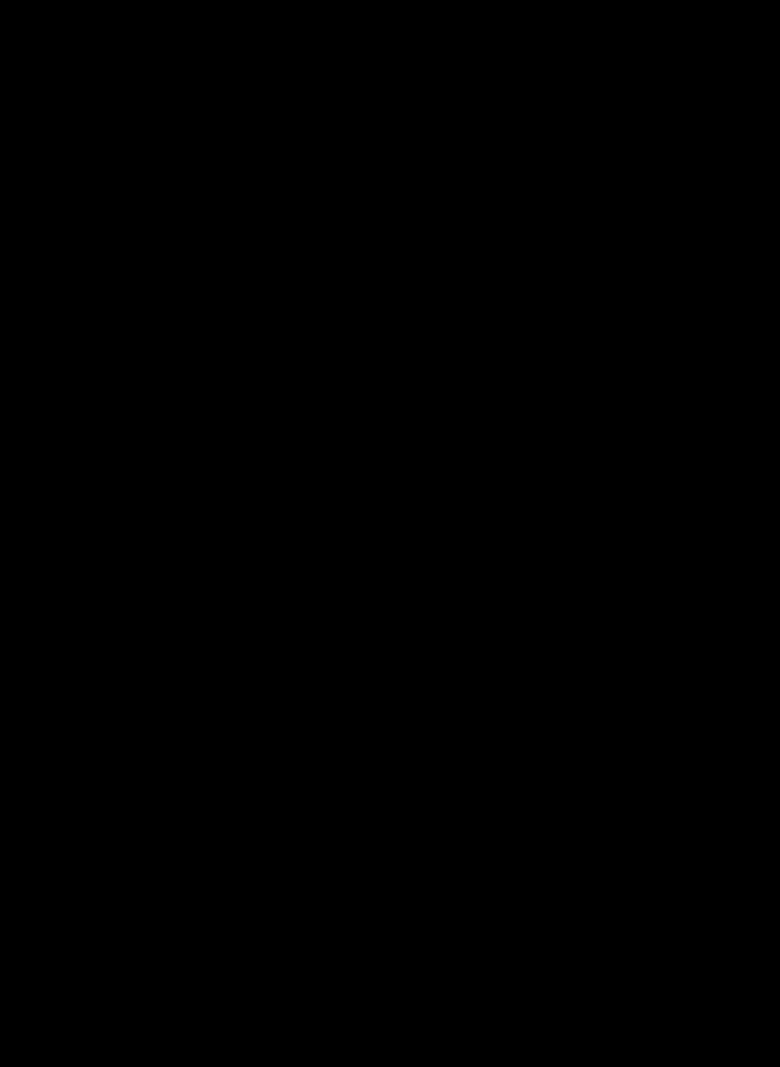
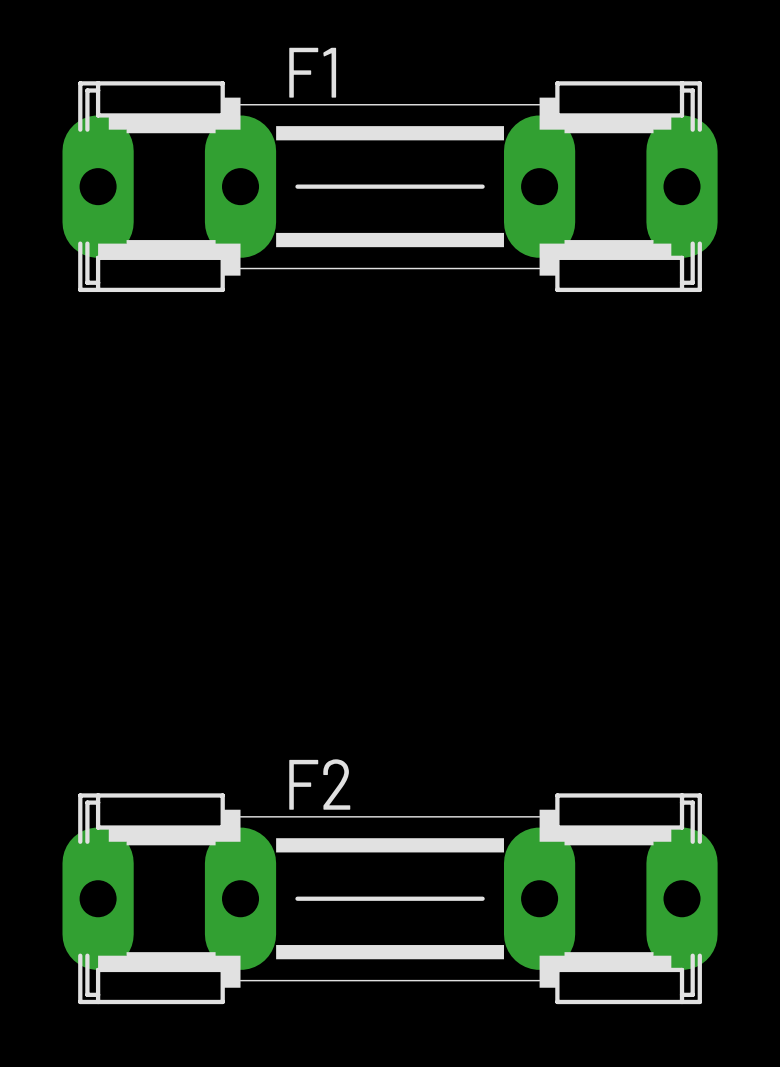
F1: none -> (390, 186)
F2: none -> (390, 898)

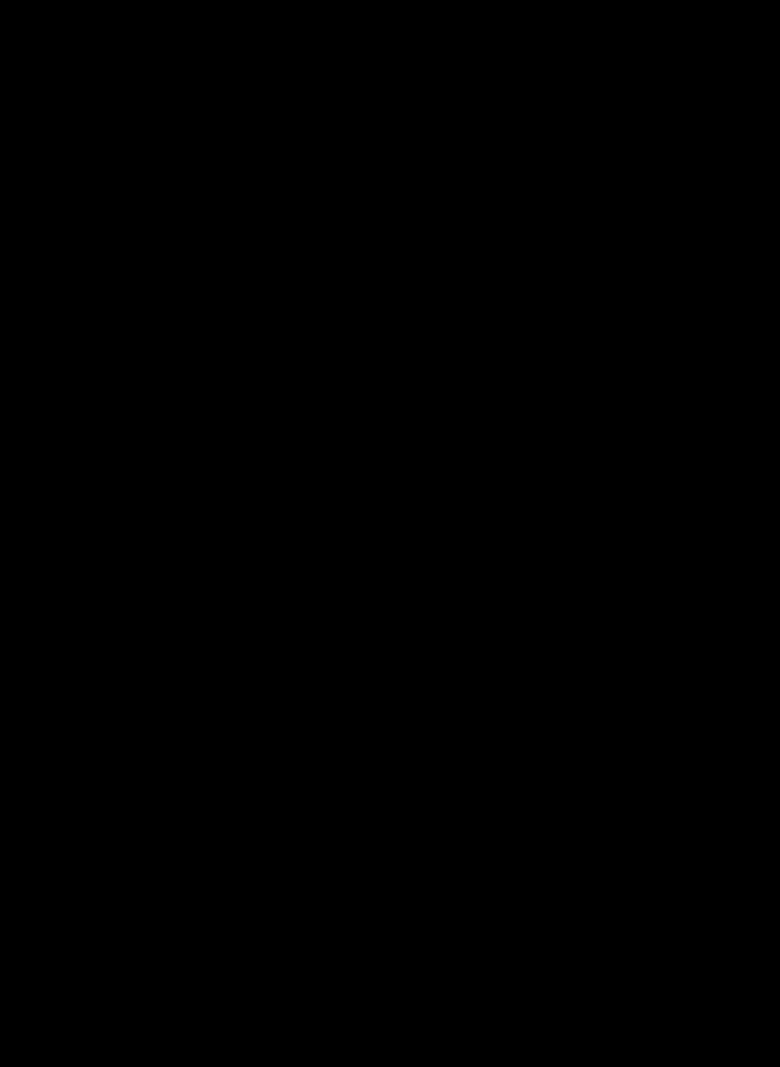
F1: (390, 186) -> none
F2: (390, 898) -> none

